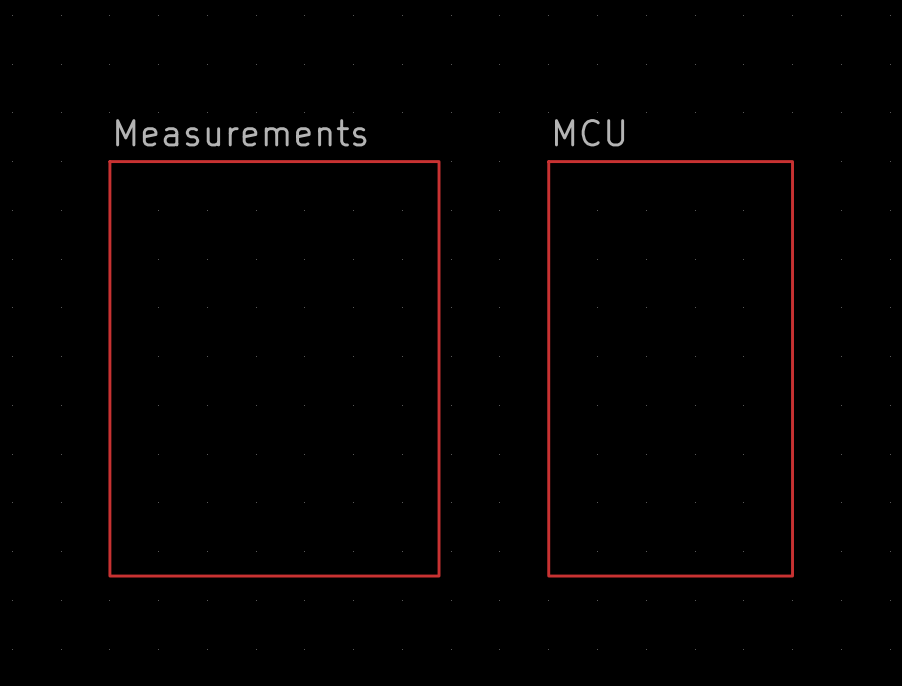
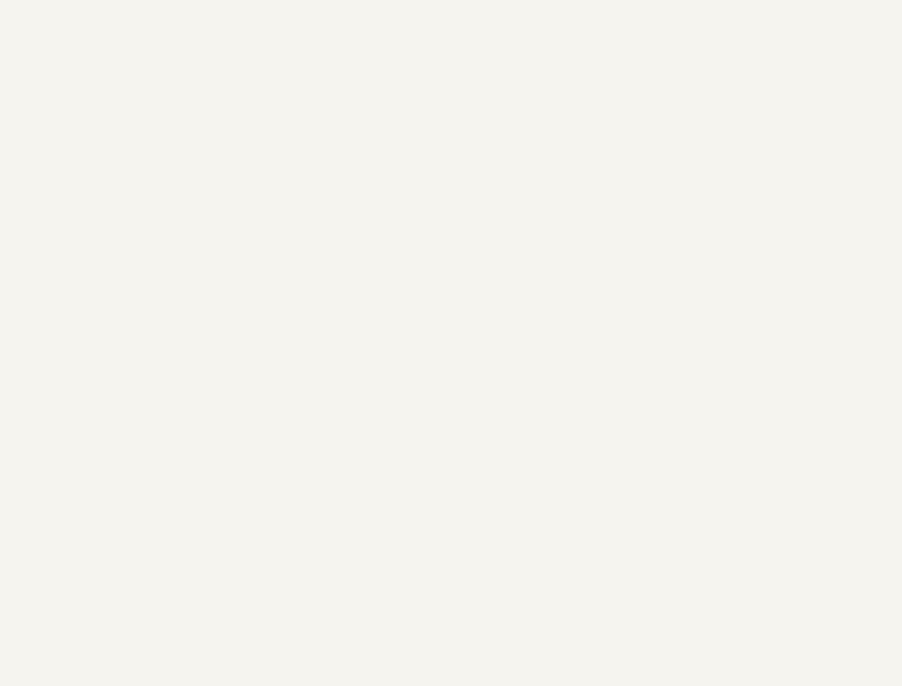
sheet Measurements: (274, 368) -> none
sheet MCU: (670, 368) -> none

